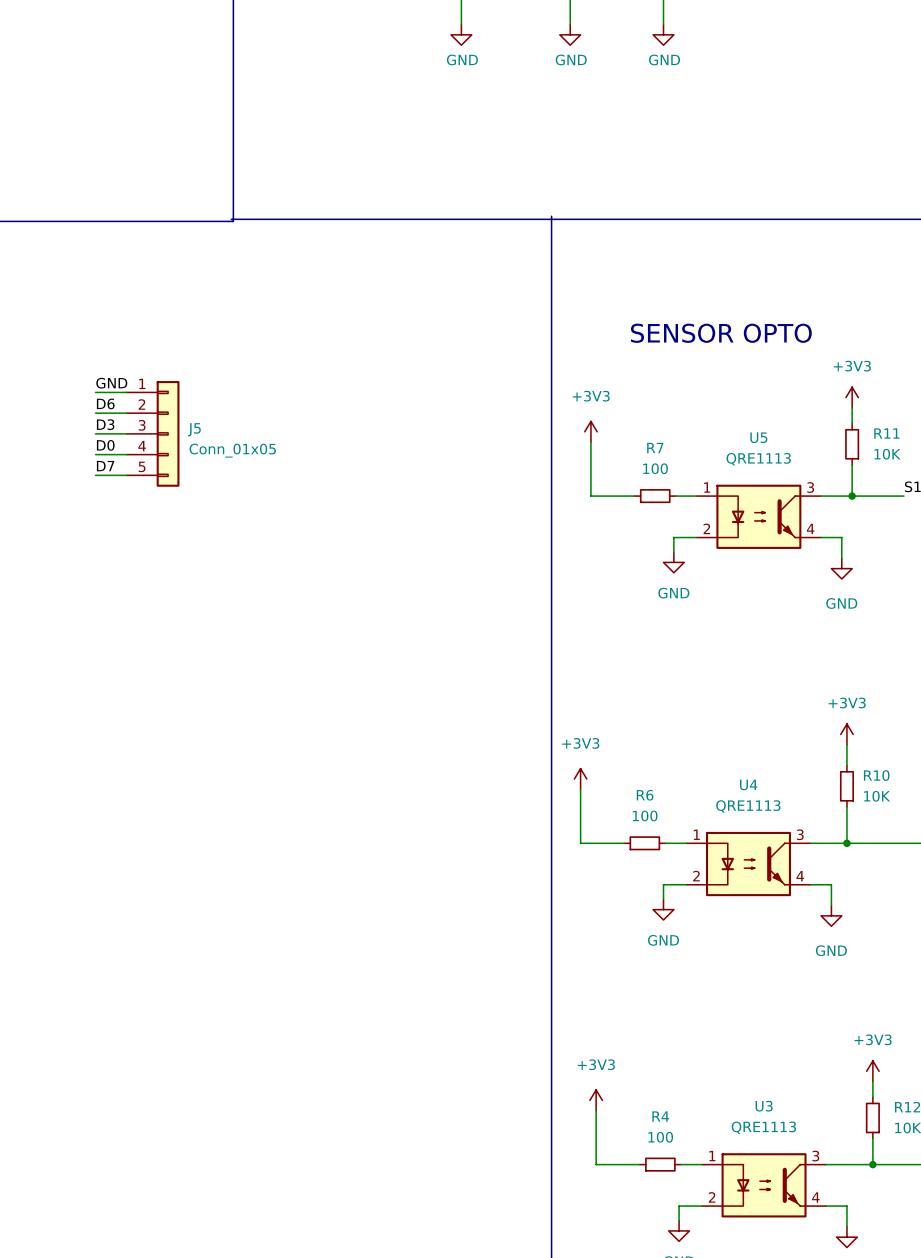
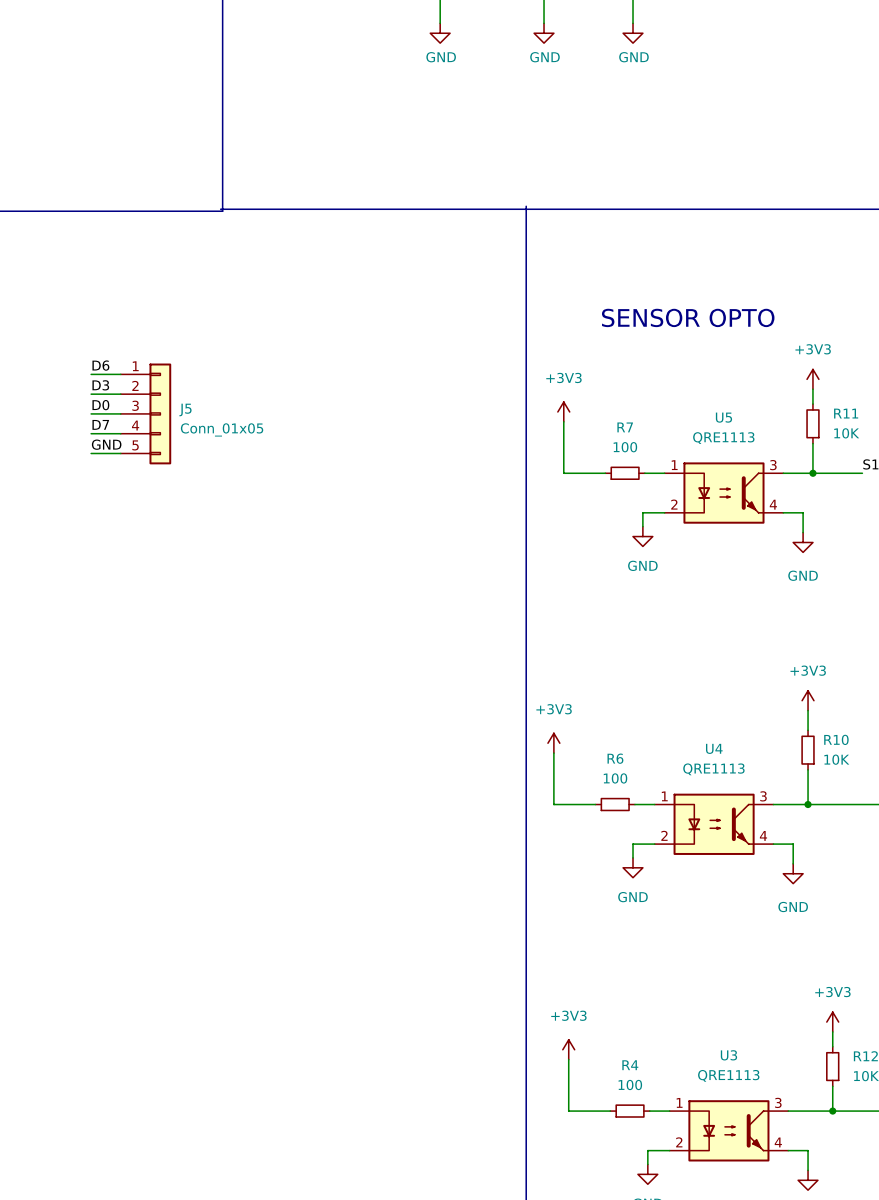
label: GND (111, 383) -> D6 (100, 365)
label: D6 (105, 403) -> D3 (100, 385)
label: D3 (105, 424) -> D0 (100, 405)
label: D0 (105, 445) -> D7 (100, 424)
label: D7 (105, 466) -> GND (106, 444)

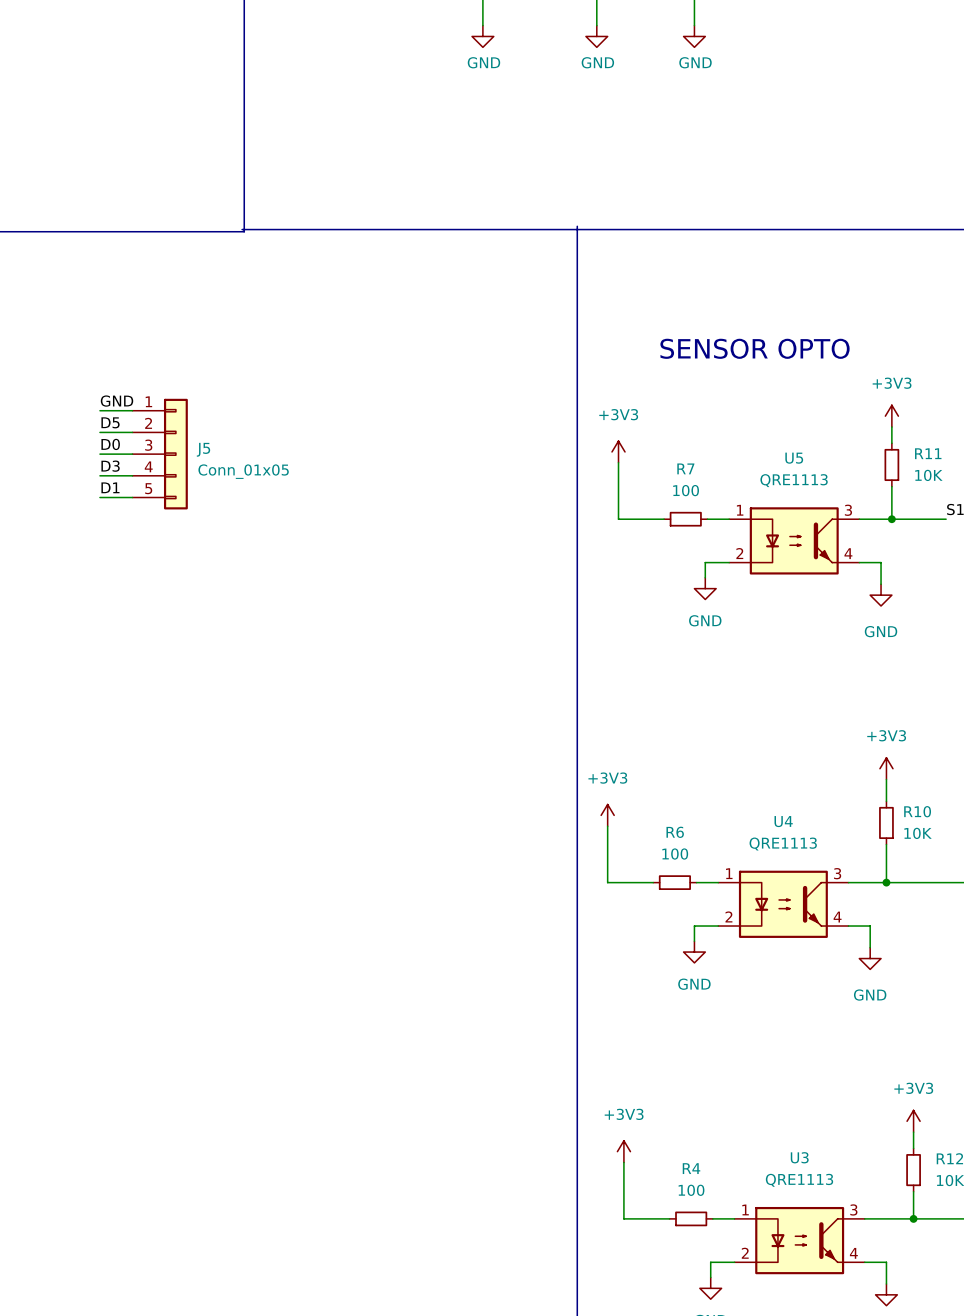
label: D6 (100, 365) -> GND (117, 401)
label: D3 (100, 385) -> D5 (110, 422)
label: D7 (100, 424) -> D3 (110, 466)
label: GND (106, 444) -> D1 (110, 487)

